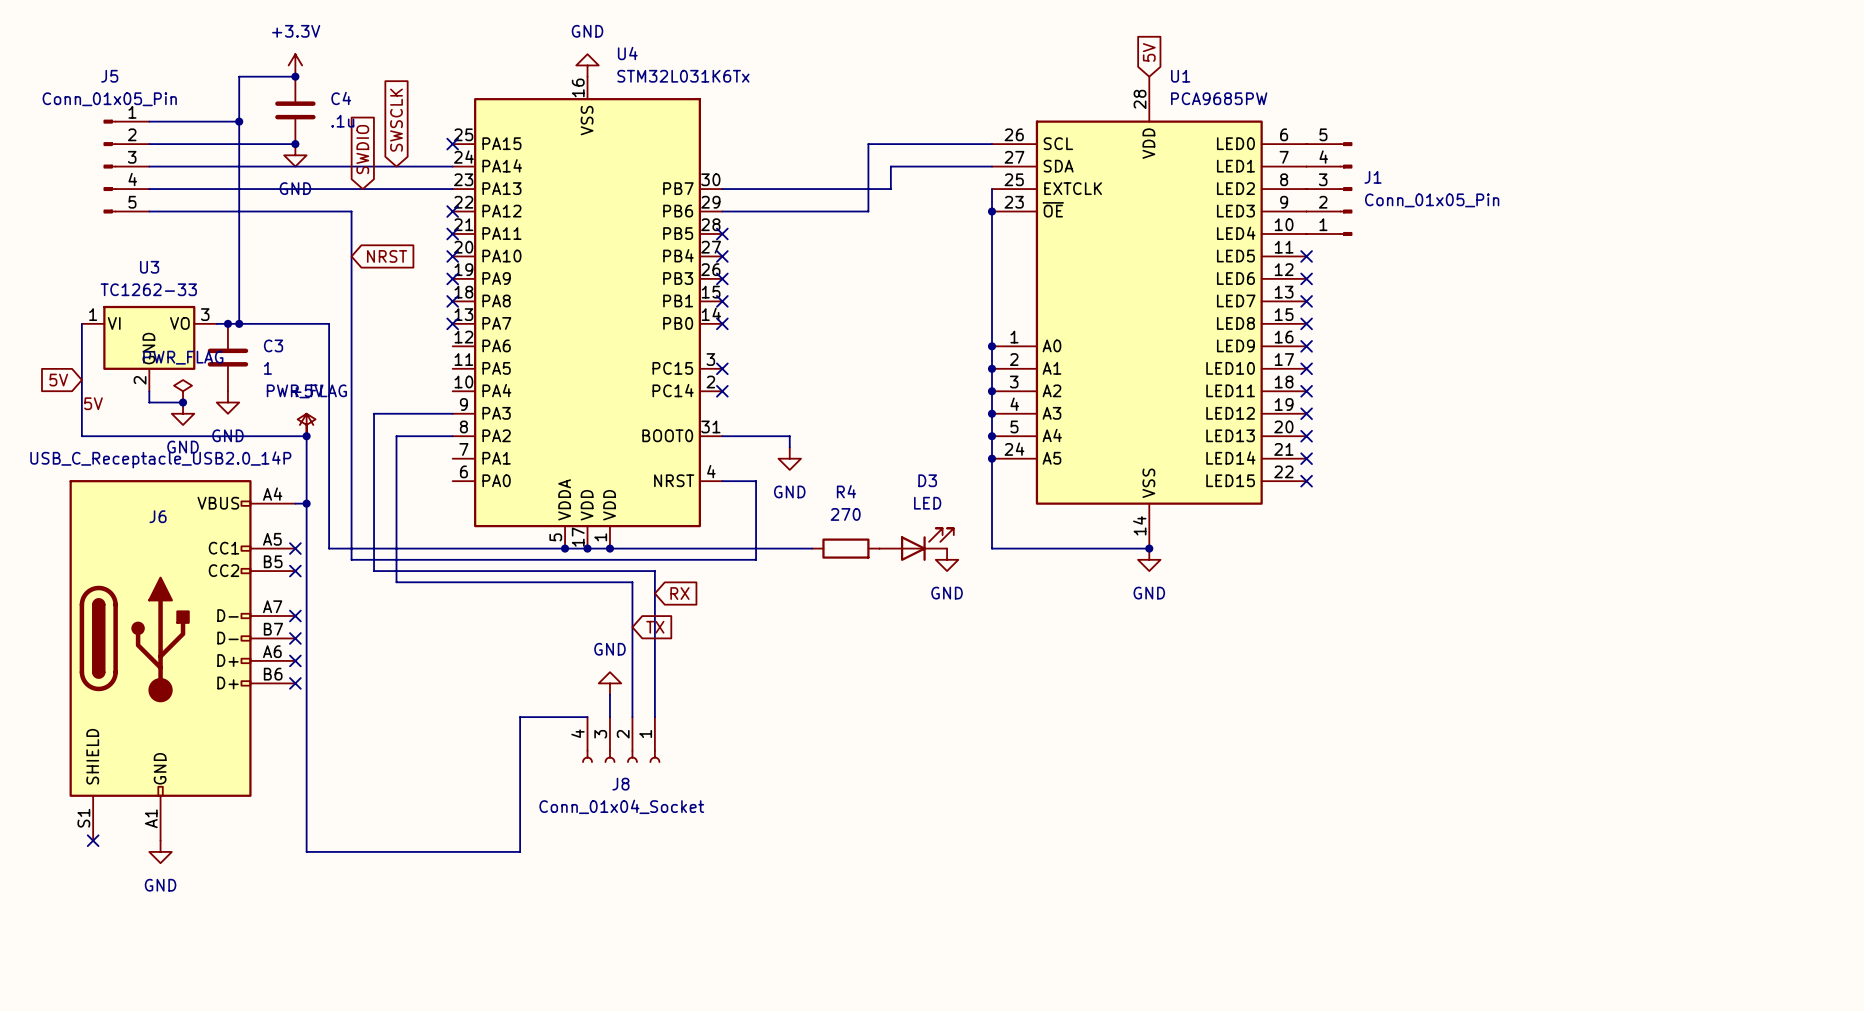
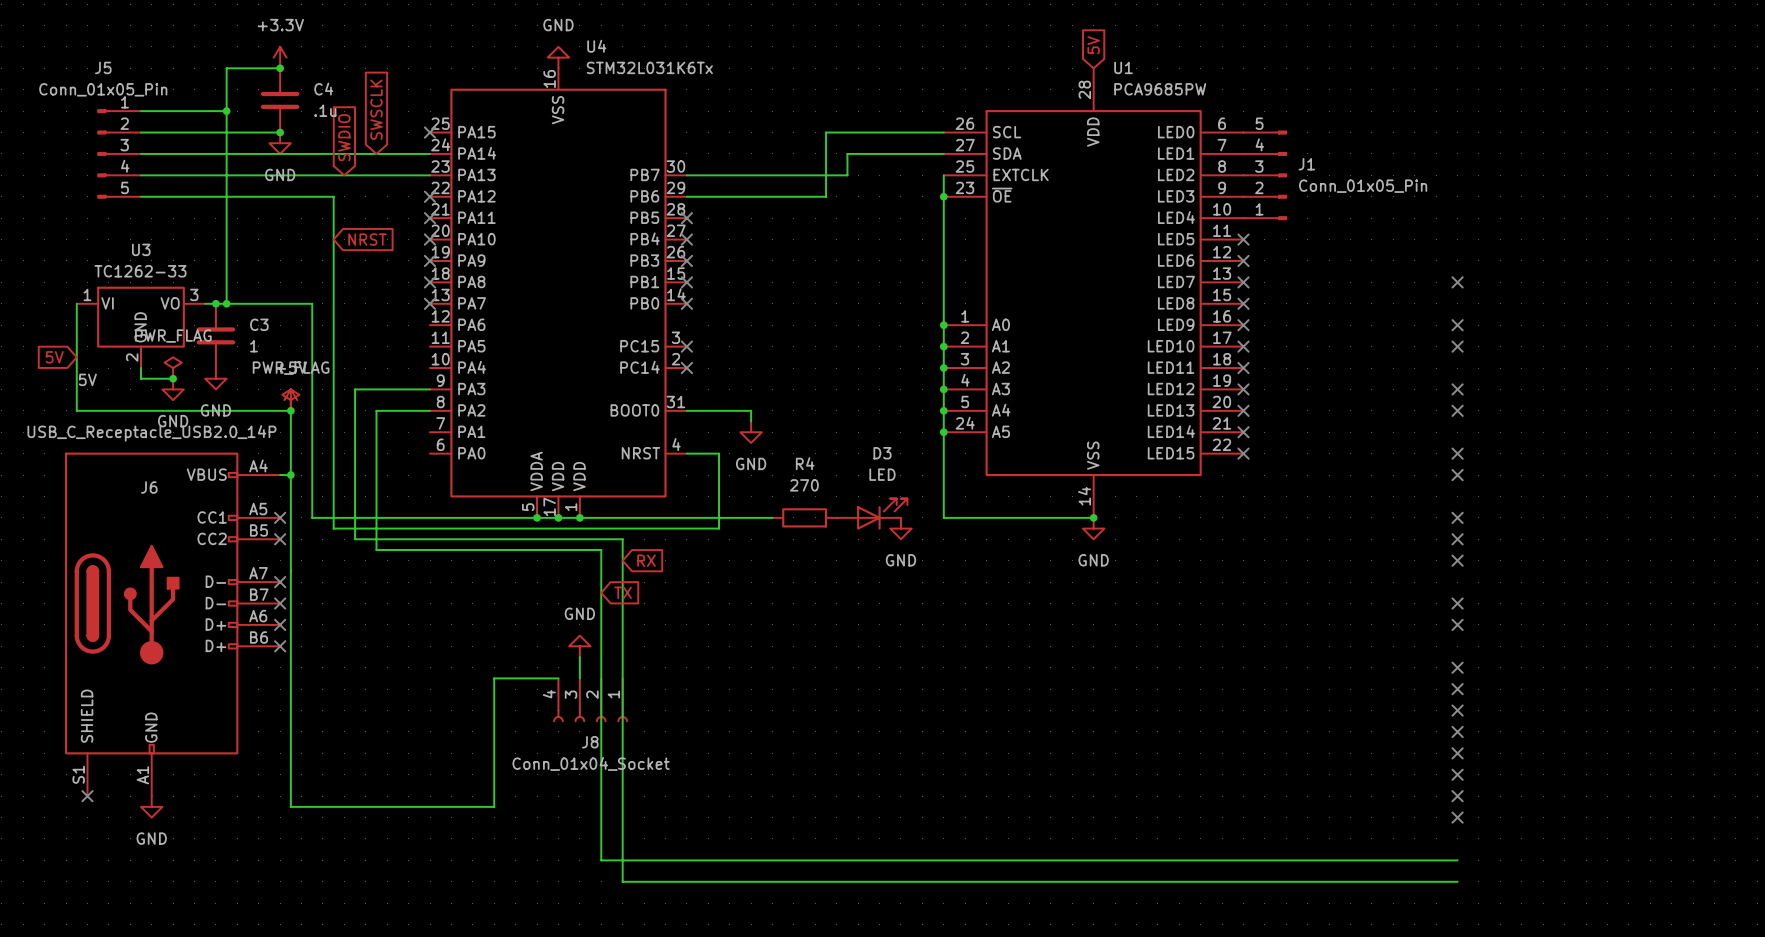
no-connect mark: none -> (1457, 282)
no-connect mark: none -> (1457, 325)
no-connect mark: none -> (1457, 346)
no-connect mark: none -> (1457, 389)
no-connect mark: none -> (1457, 410)
no-connect mark: none -> (1457, 453)
no-connect mark: none -> (1457, 475)
no-connect mark: none -> (1457, 517)
no-connect mark: none -> (1457, 539)
no-connect mark: none -> (1457, 560)
no-connect mark: none -> (1457, 603)
no-connect mark: none -> (1457, 624)
no-connect mark: none -> (1457, 667)
wire: none -> (601, 678) (601, 860) (1457, 860)
wire: none -> (622, 678) (622, 881) (1457, 881)
no-connect mark: none -> (1457, 689)
no-connect mark: none -> (1457, 710)
no-connect mark: none -> (1457, 731)
no-connect mark: none -> (1457, 753)
no-connect mark: none -> (1457, 774)
no-connect mark: none -> (1457, 796)
no-connect mark: none -> (1457, 817)

